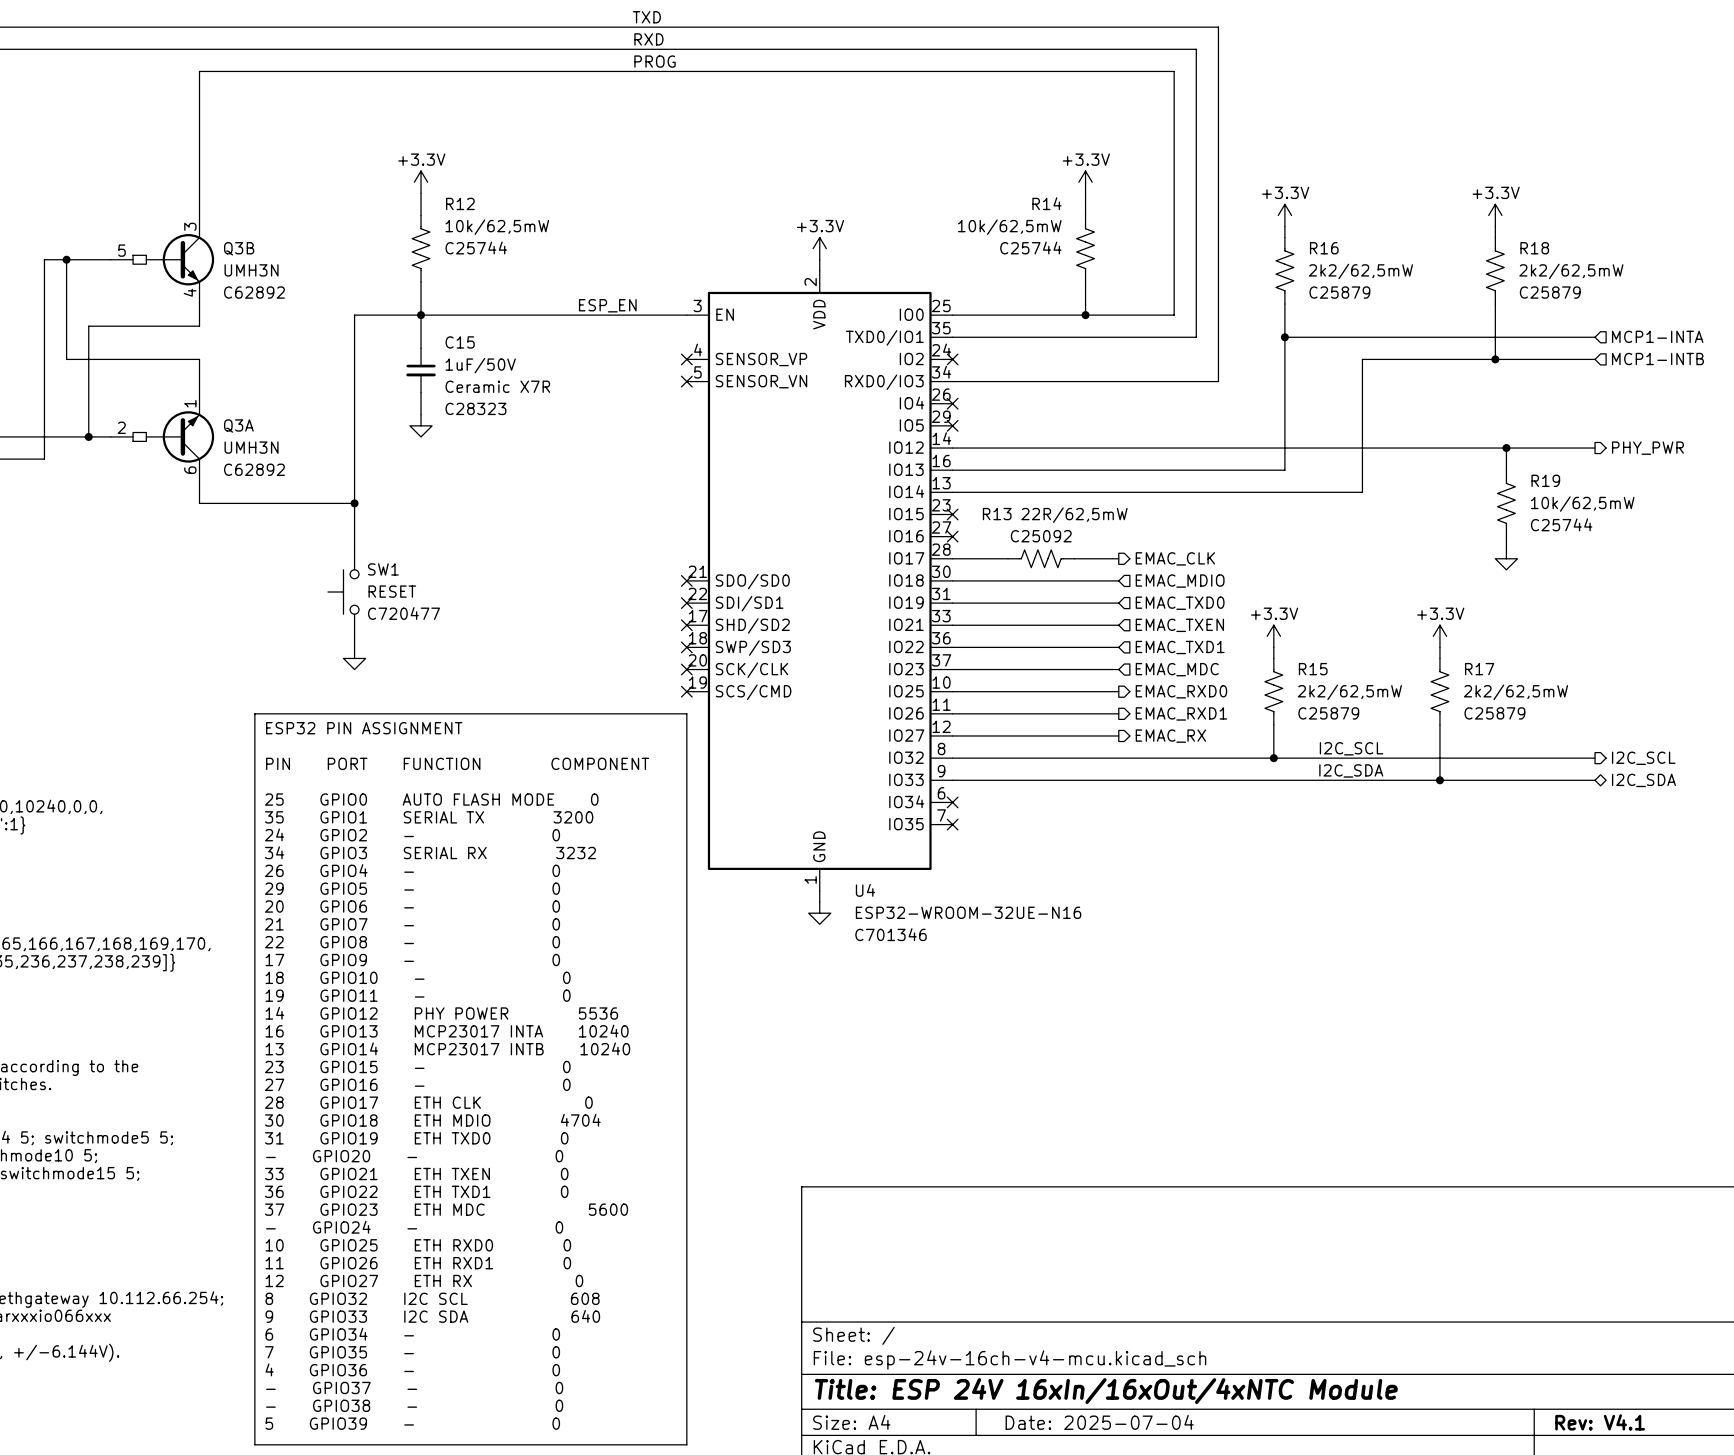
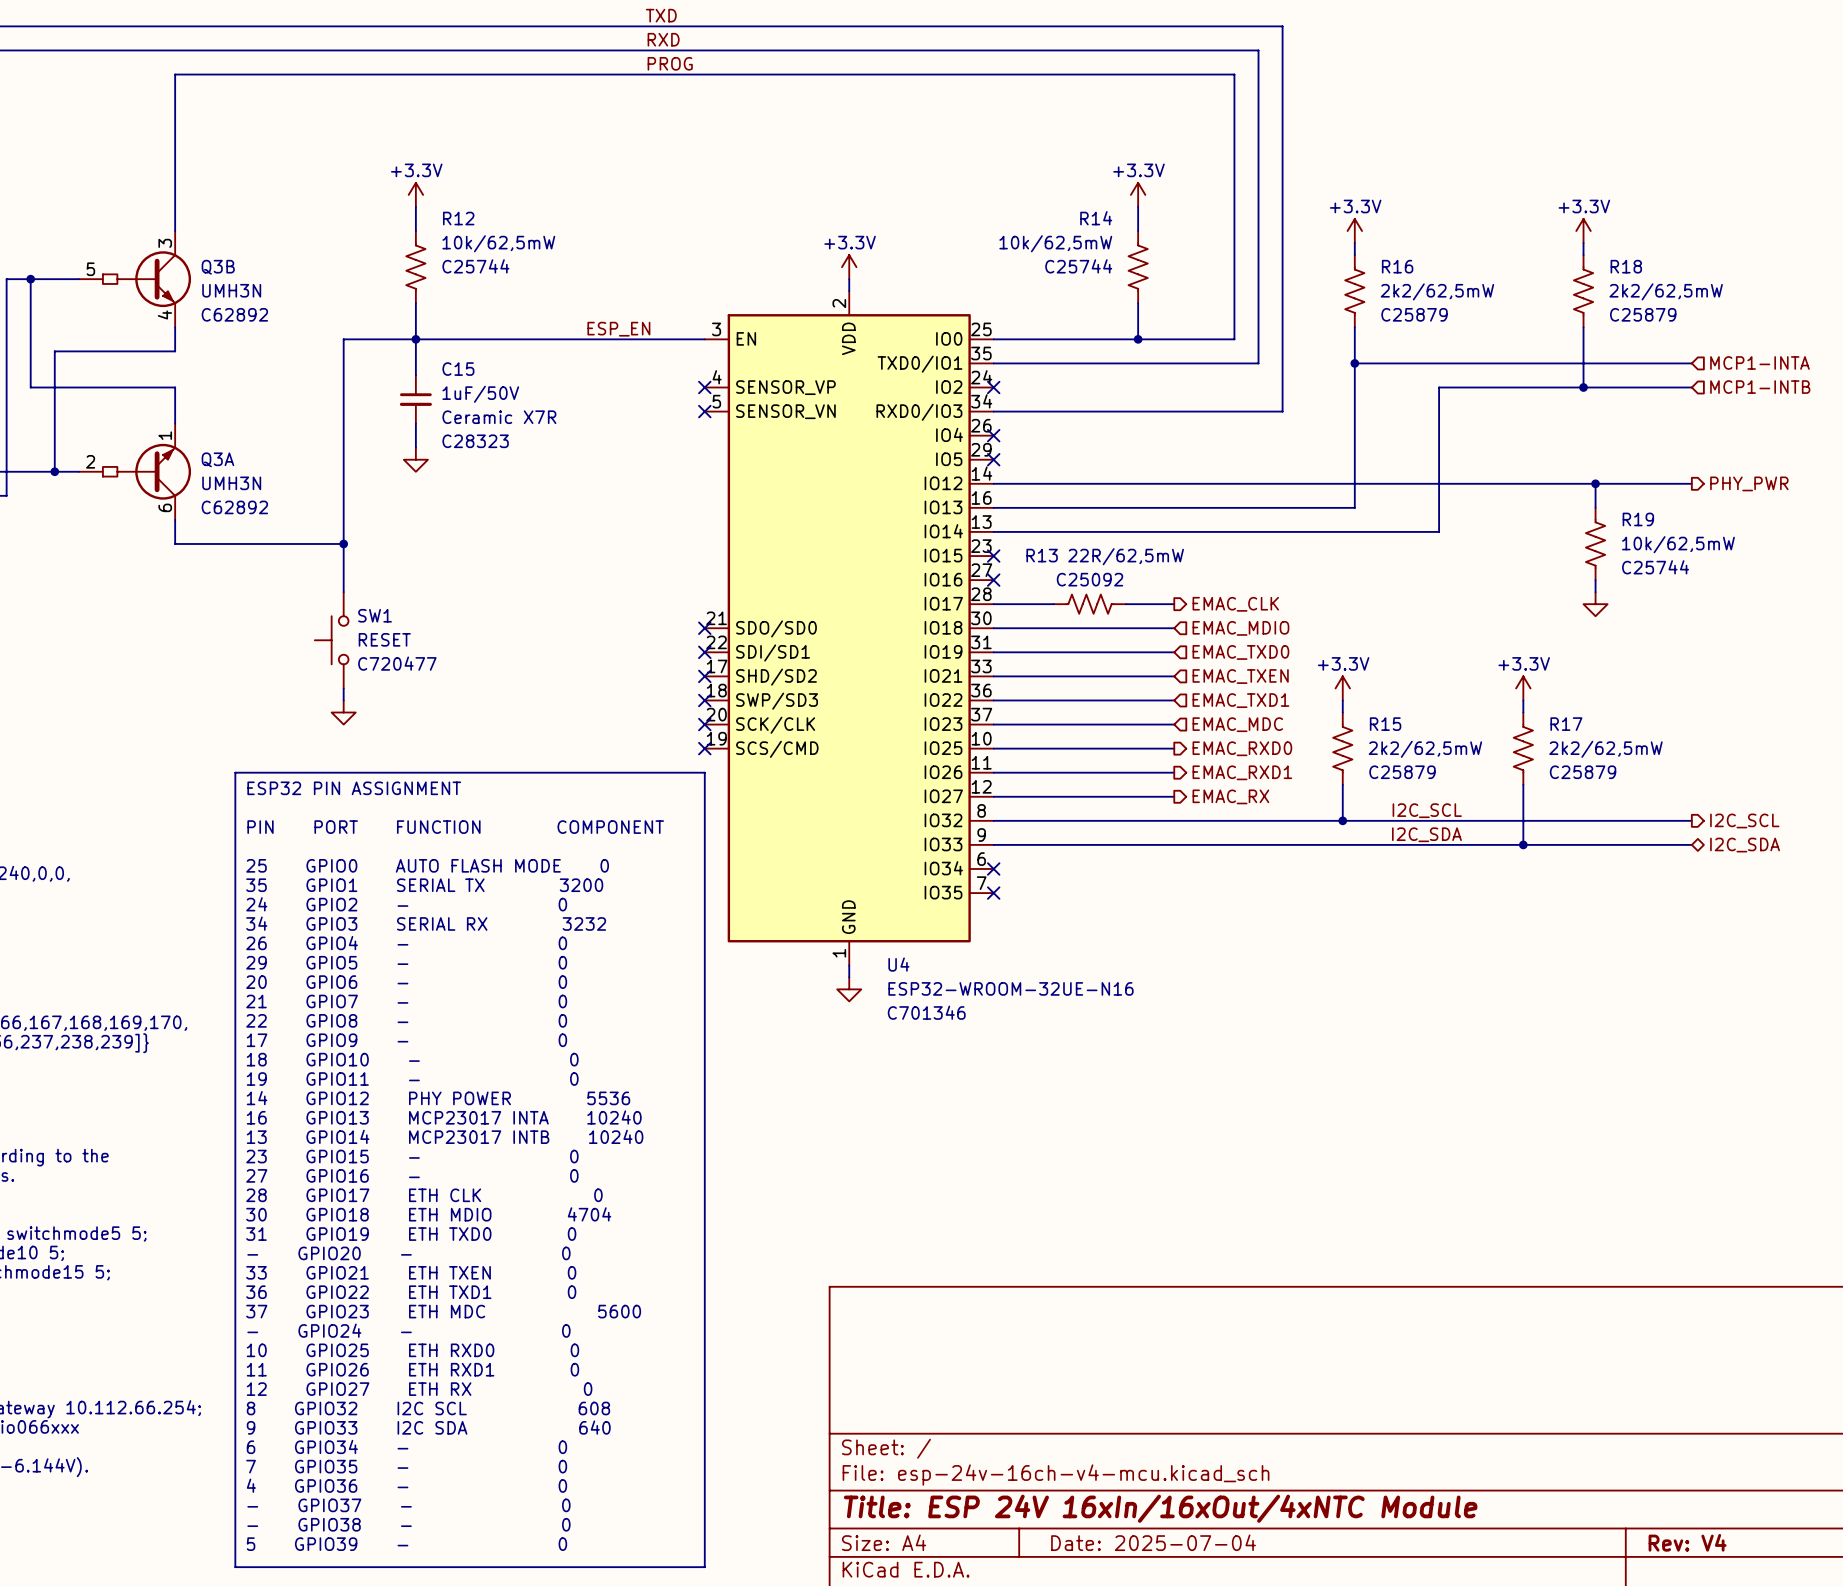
title block: Rev: V4.1 (1600, 1422) -> Rev: V4 (1687, 1542)

